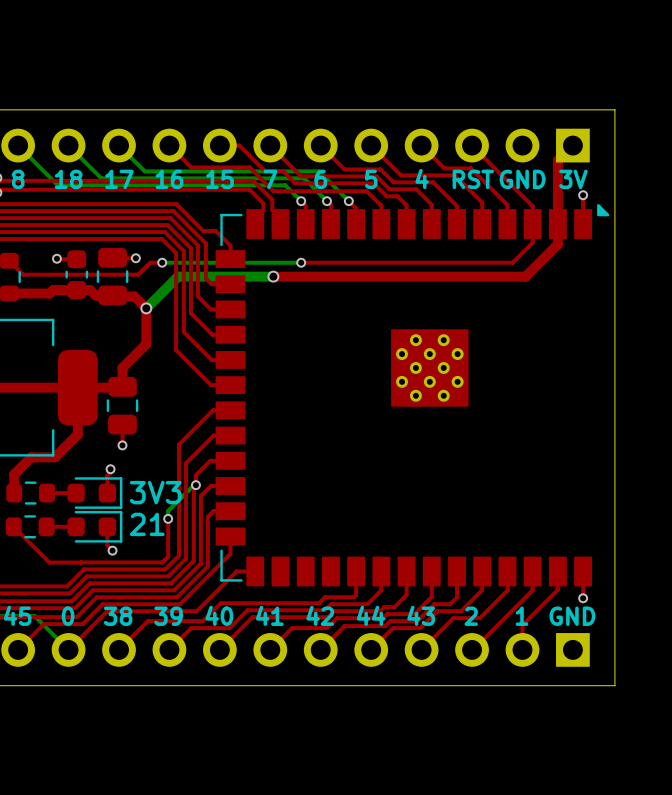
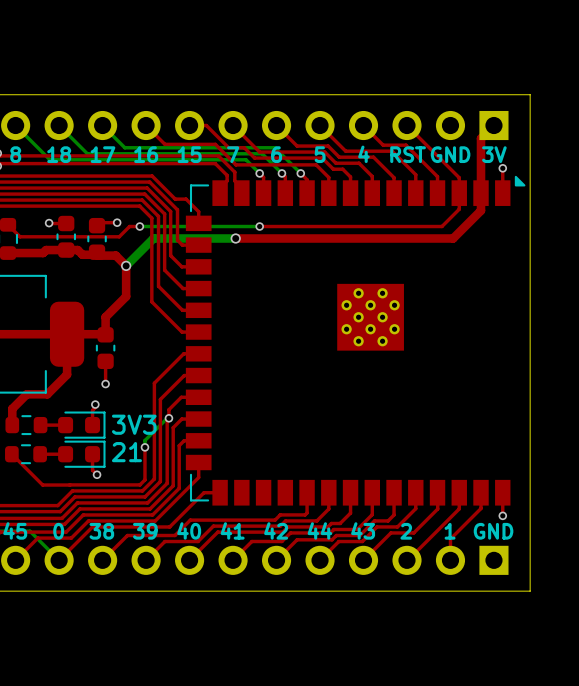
part footprint: [96, 247, 129, 306] -> [87, 217, 107, 260]
part footprint: [106, 376, 139, 435] -> [95, 327, 116, 370]

